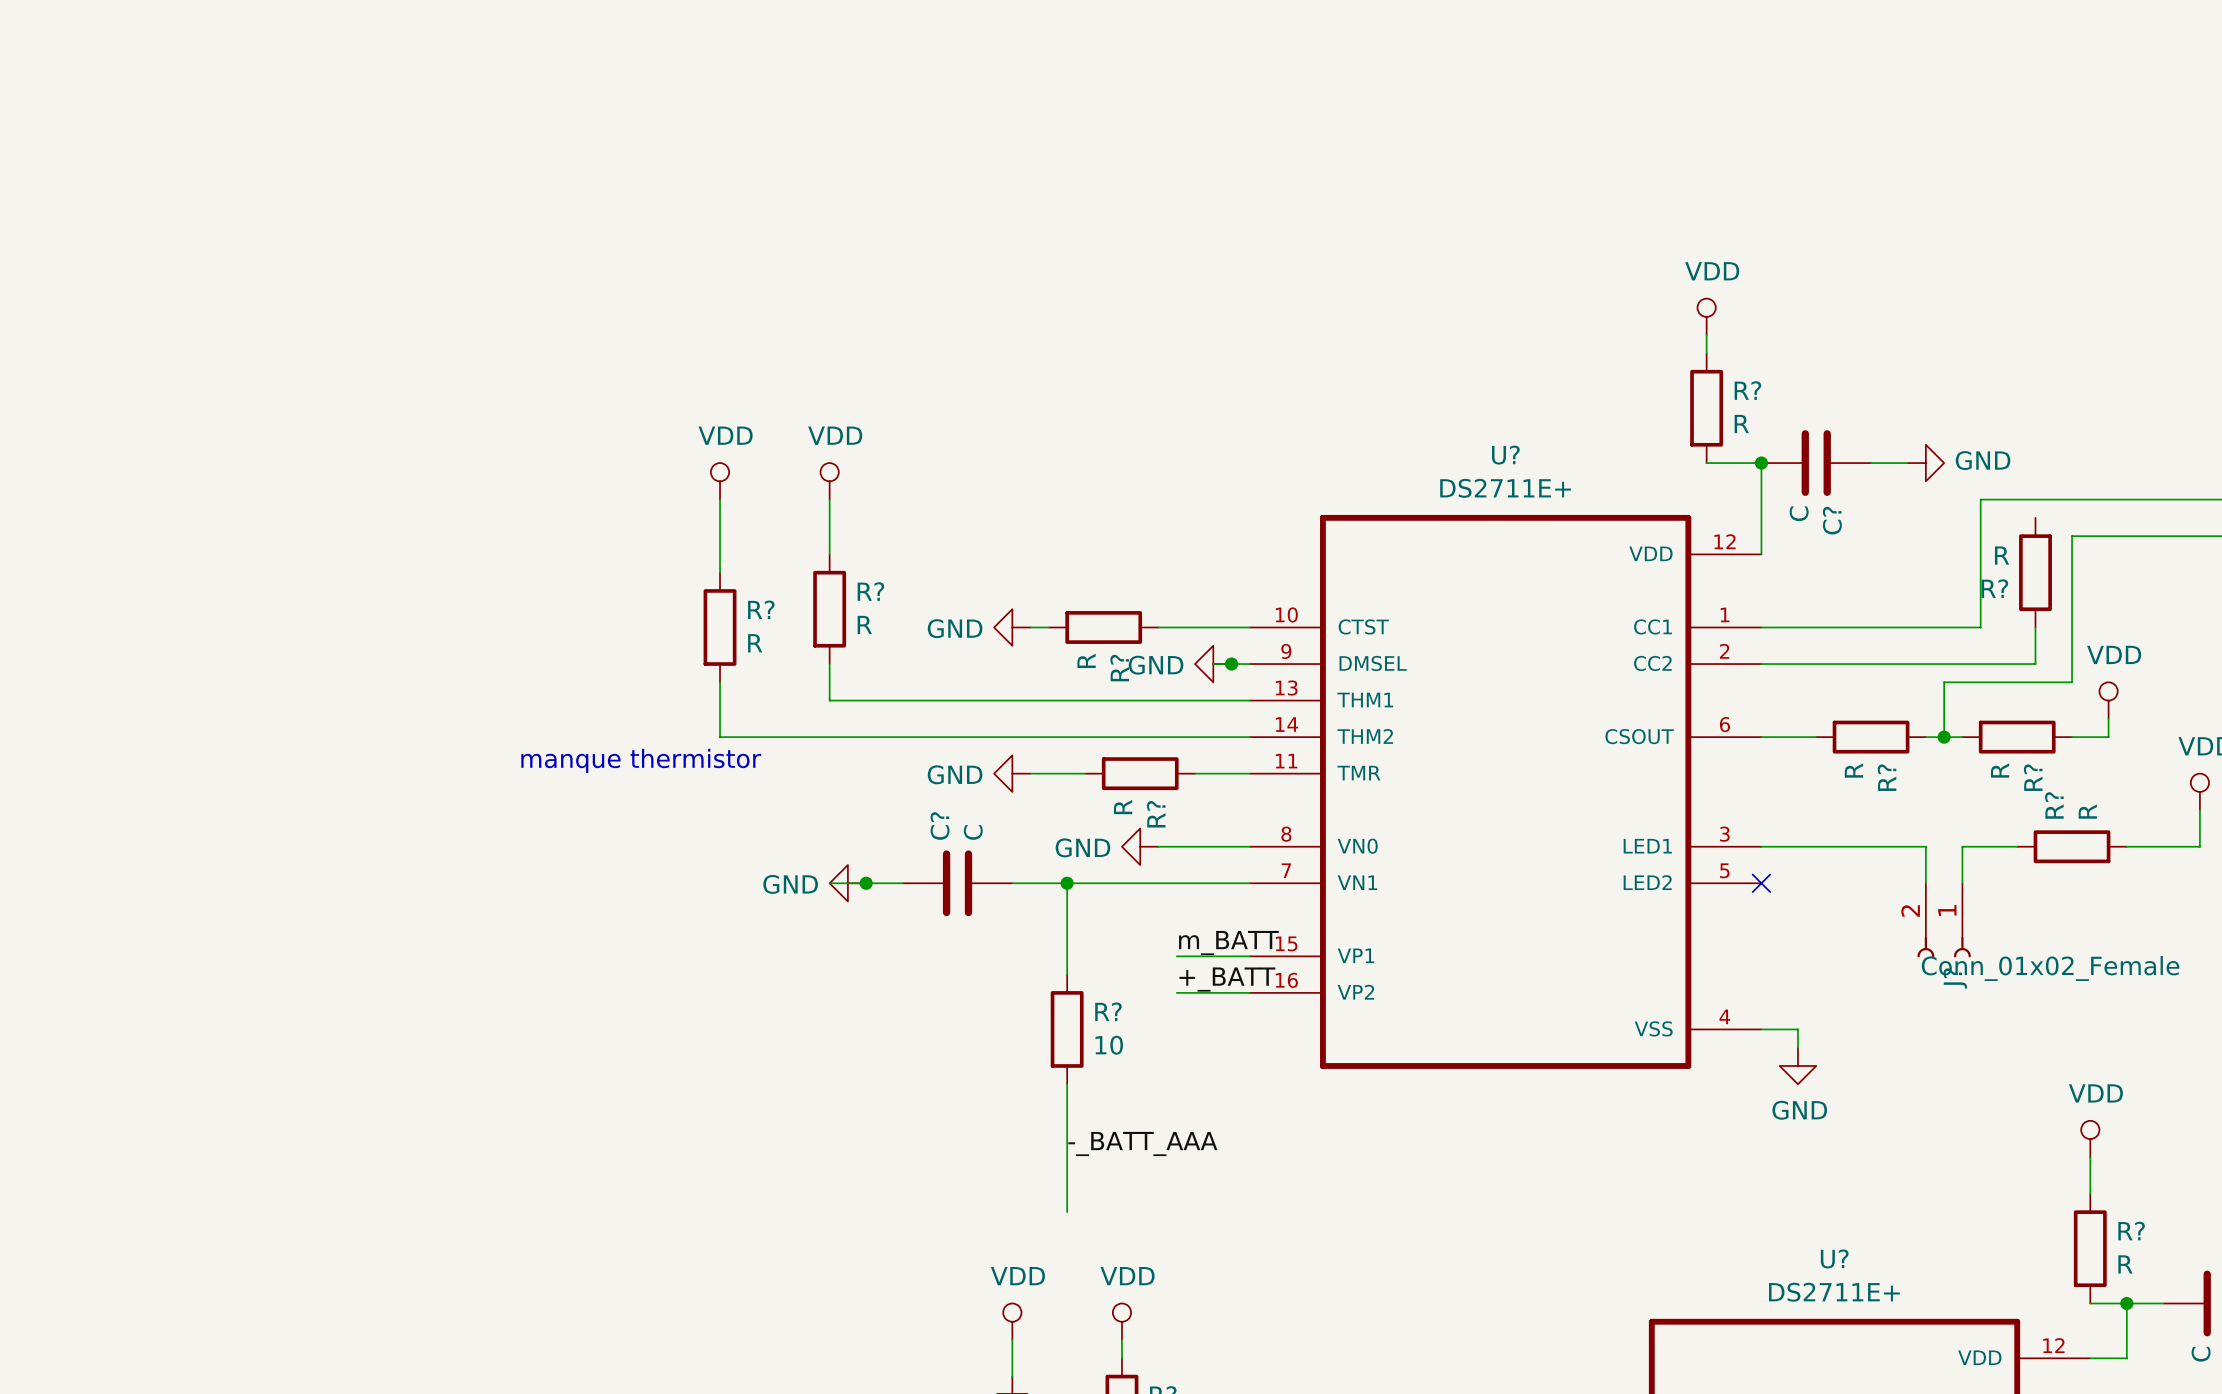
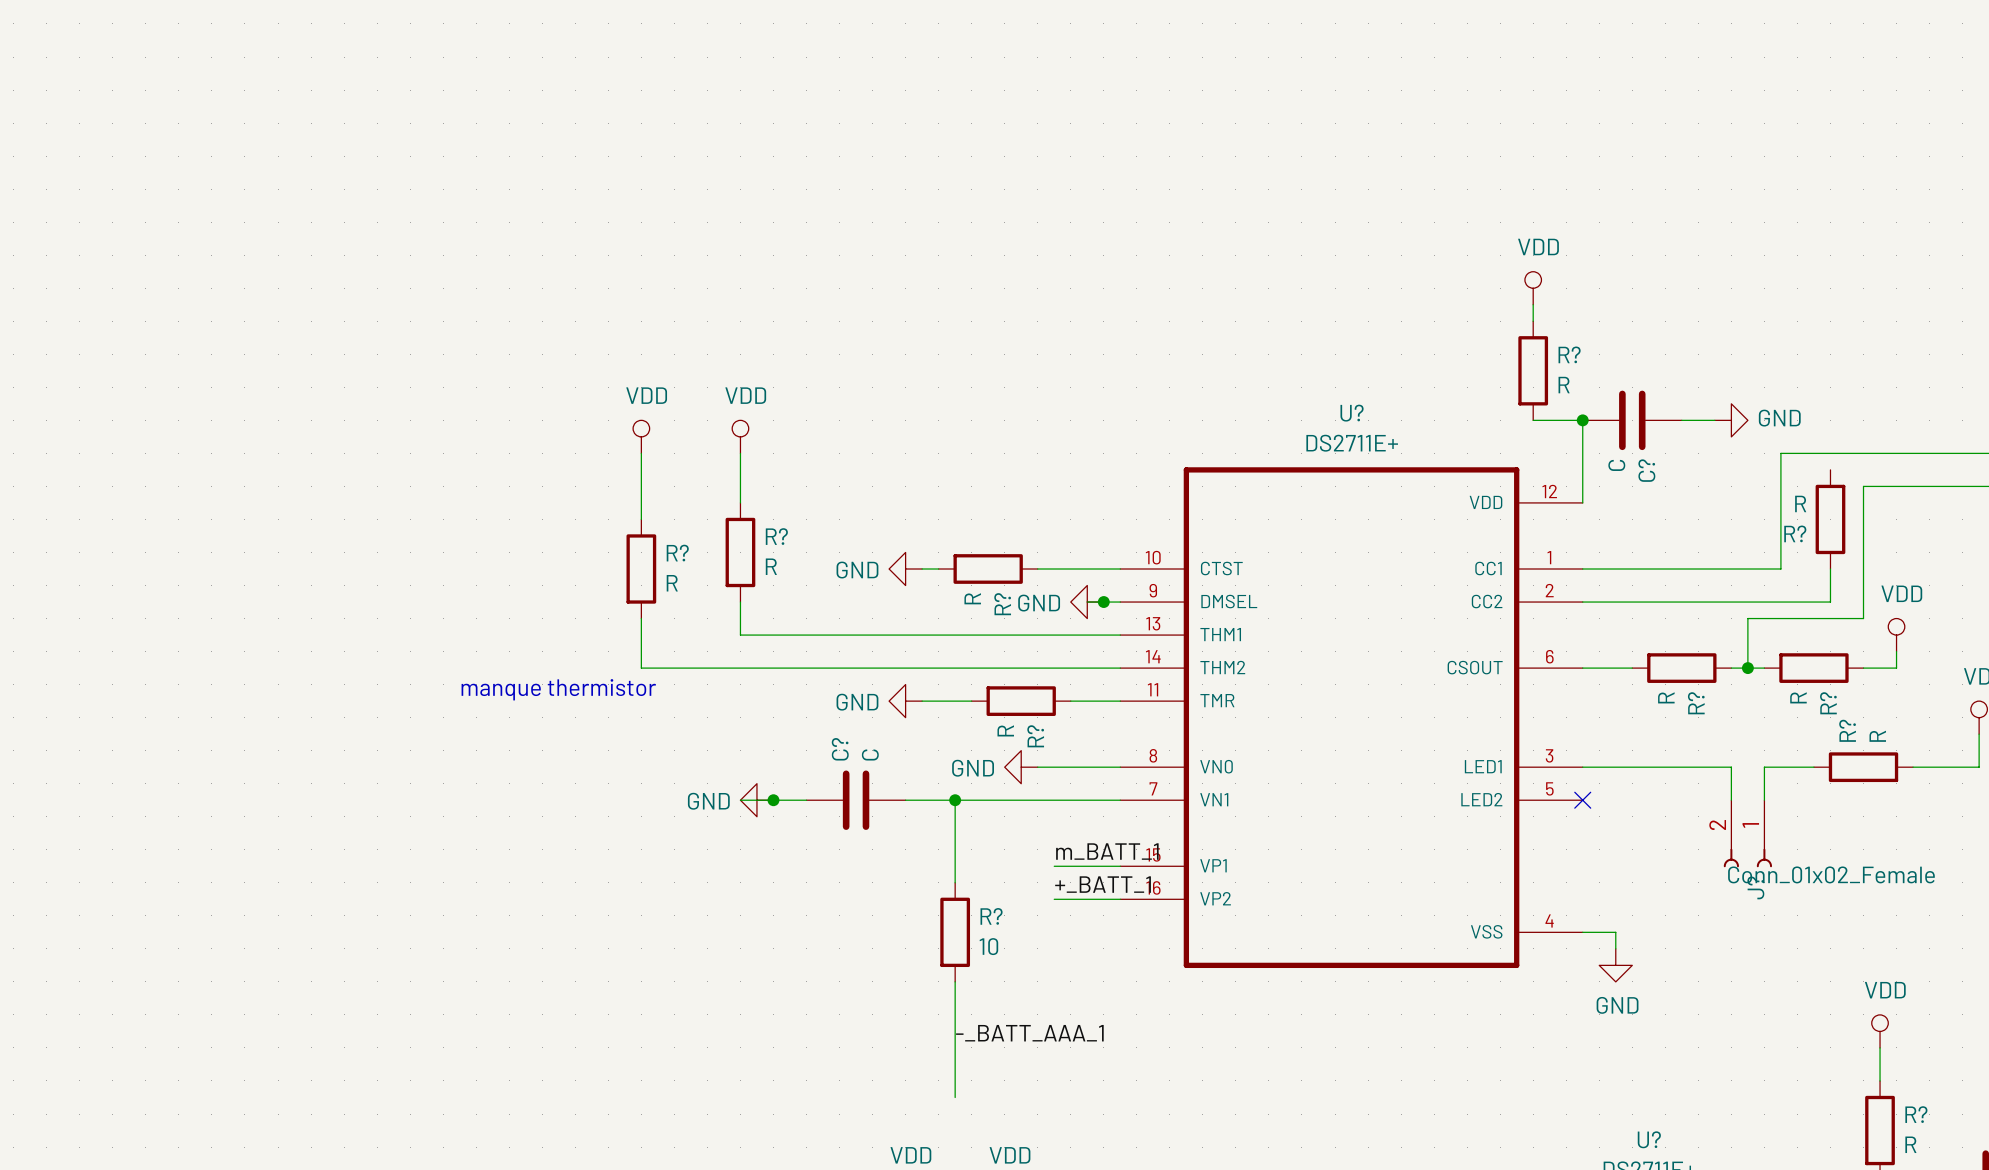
label: m_BATT (1228, 943) -> m_BATT_1 (1107, 851)
label: +_BATT (1227, 979) -> +_BATT_1 (1103, 884)
label: -_BATT_AAA (1142, 1143) -> -_BATT_AAA_1 (1029, 1033)

